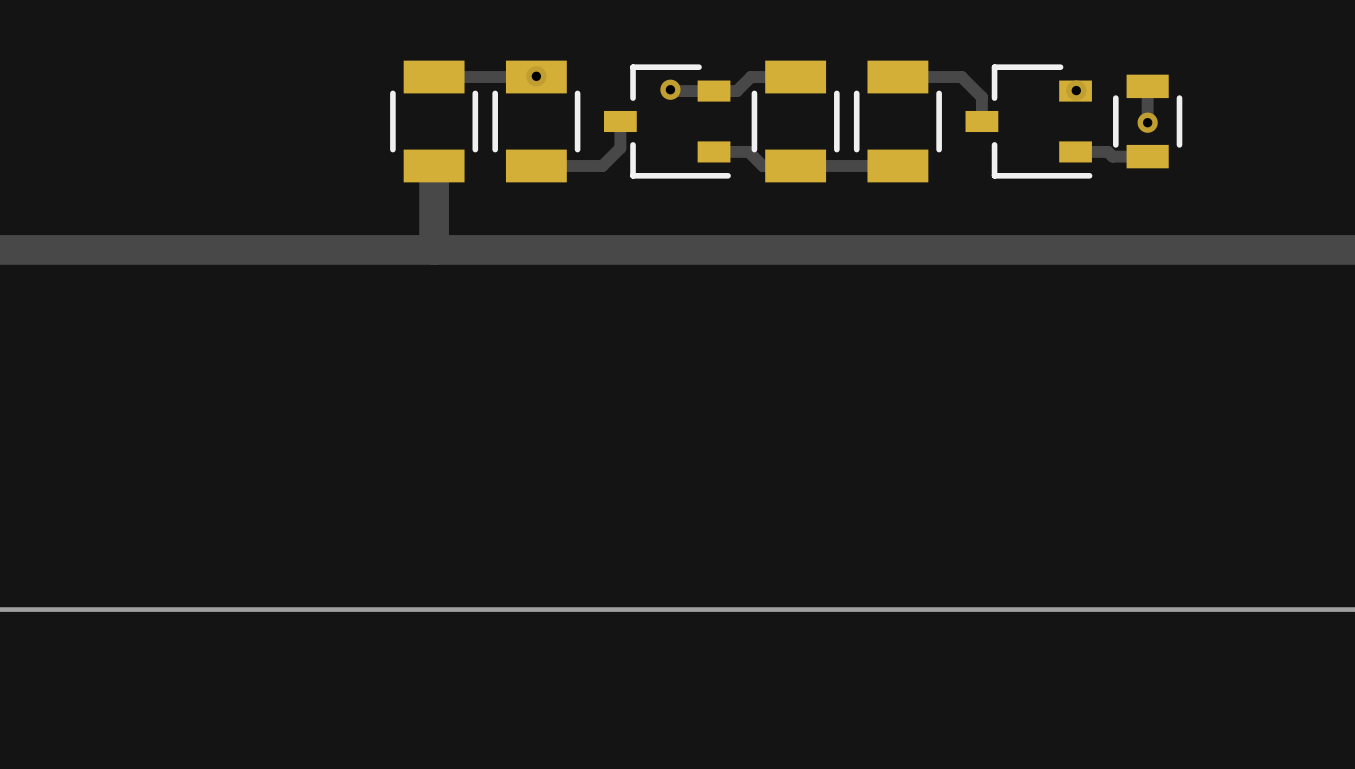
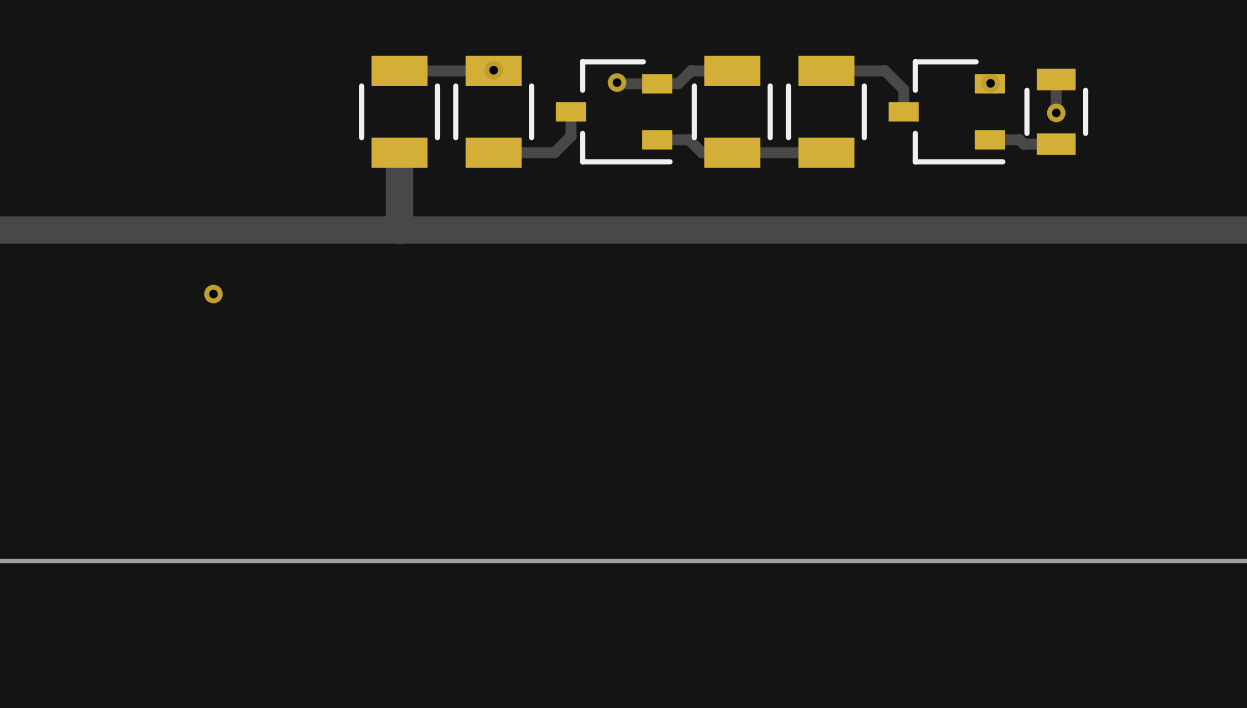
via: none -> (213, 294)

